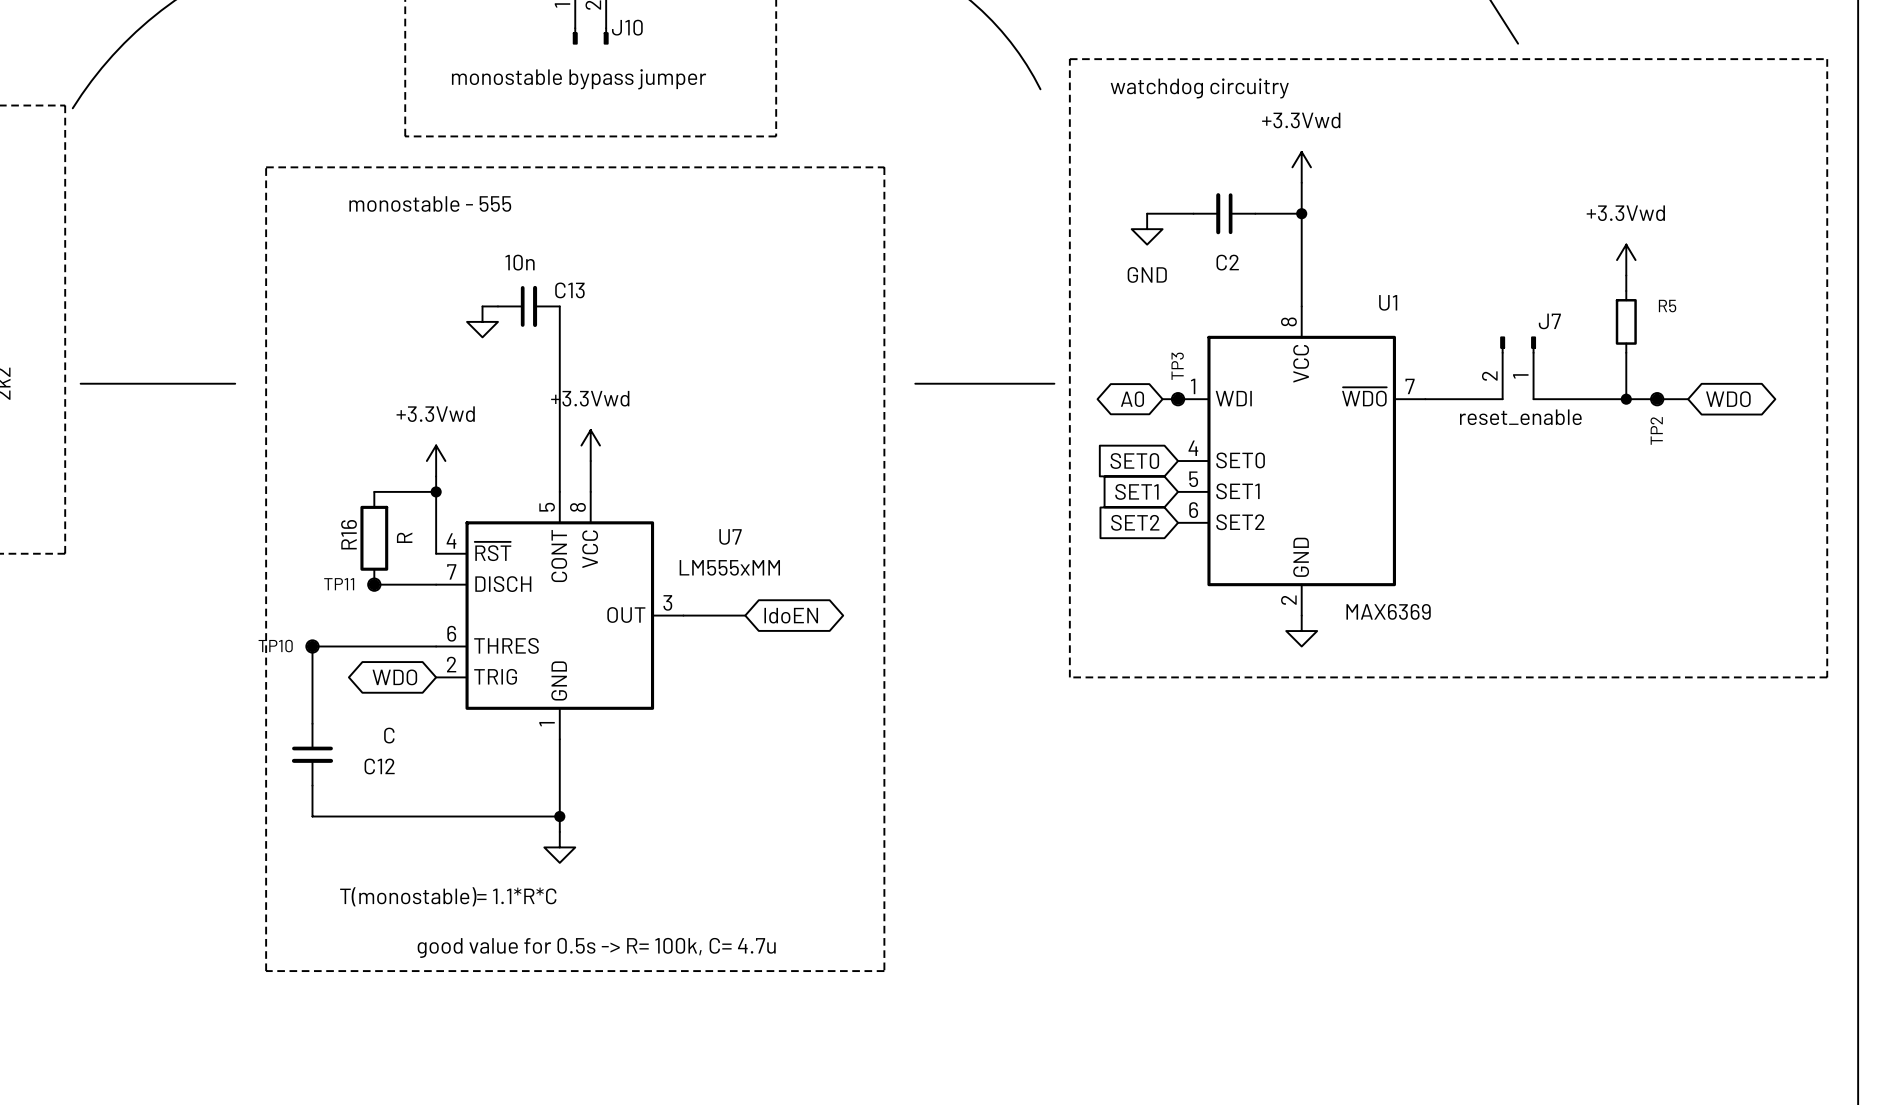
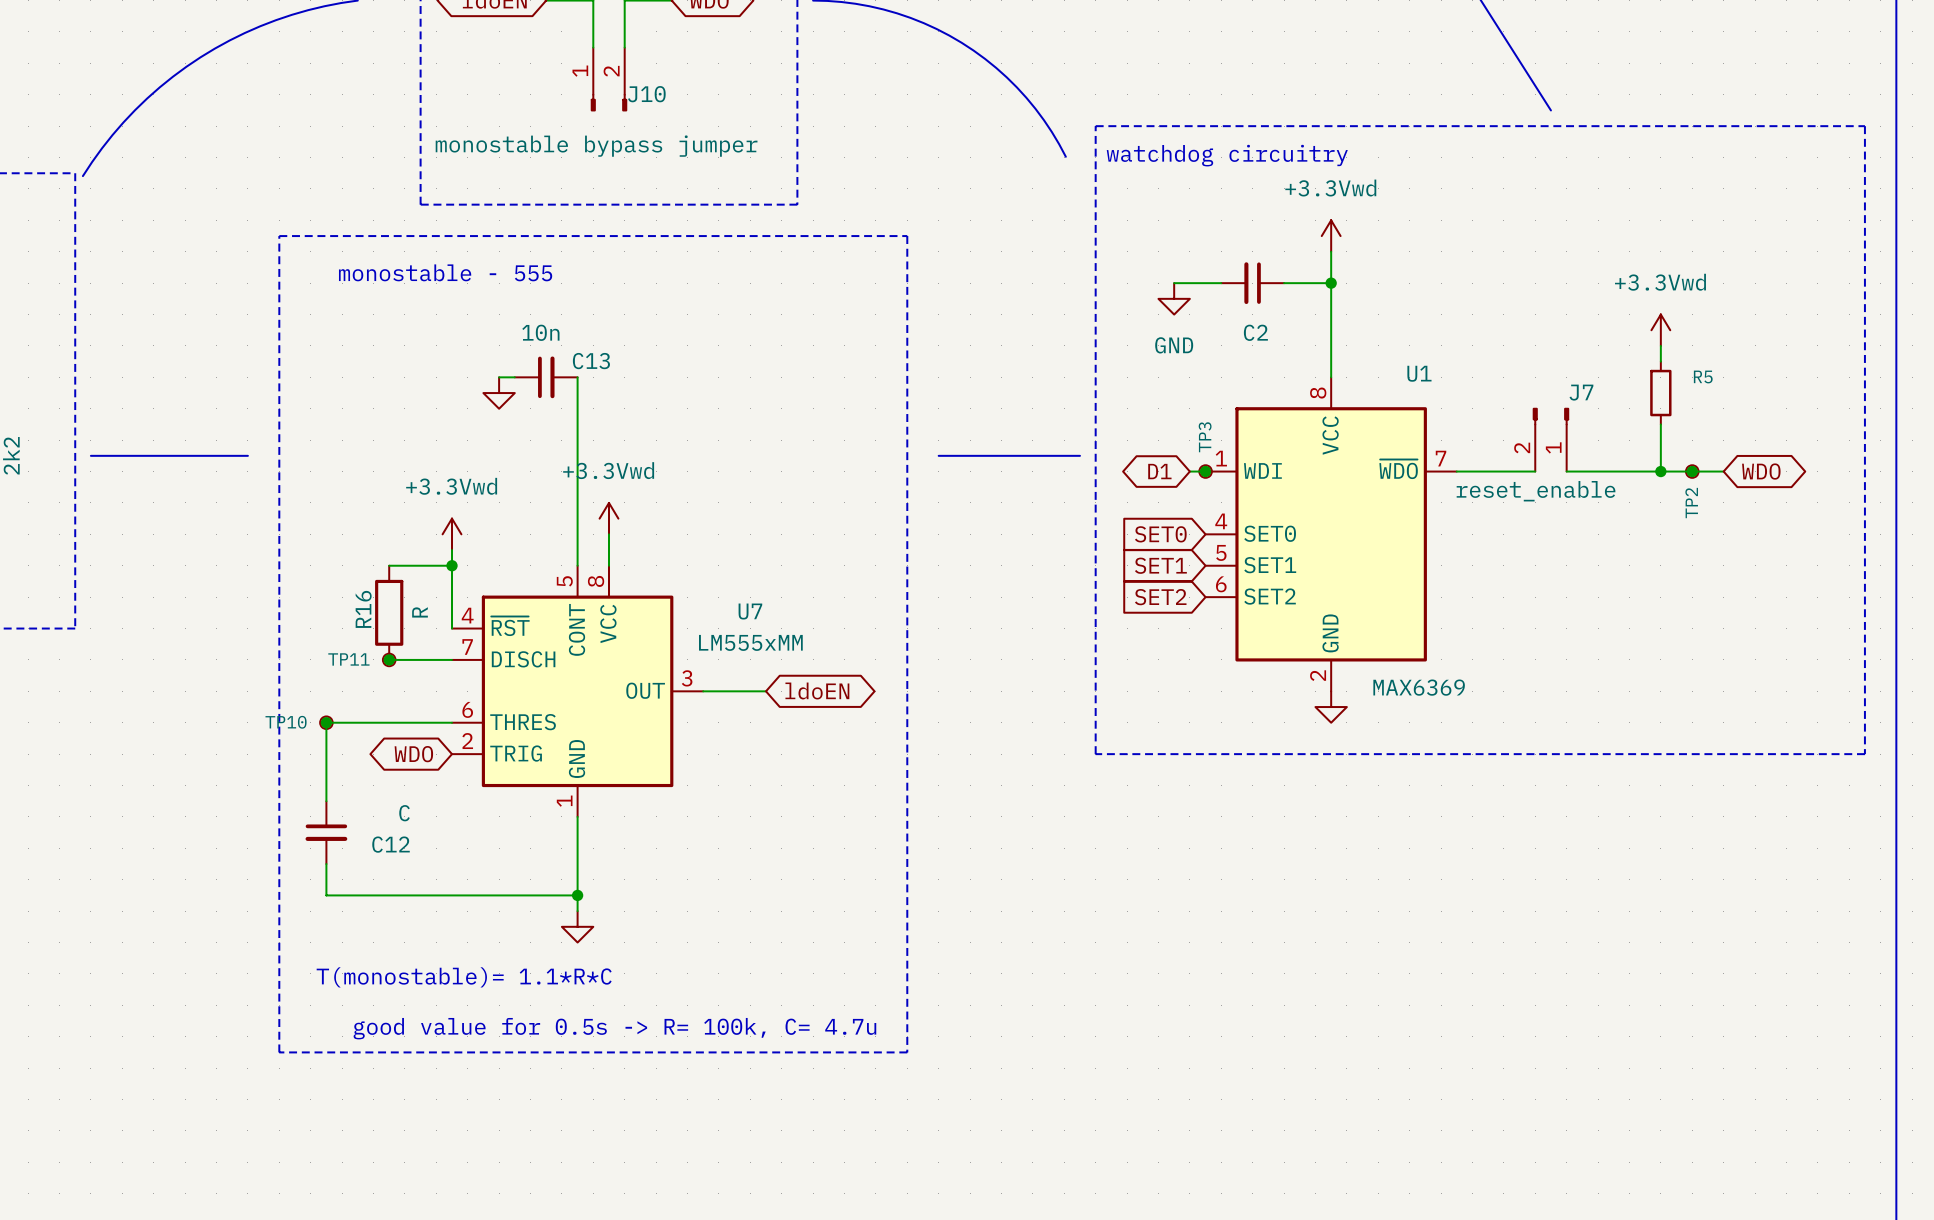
global label: A0 (1132, 399) -> D1 (1159, 471)

